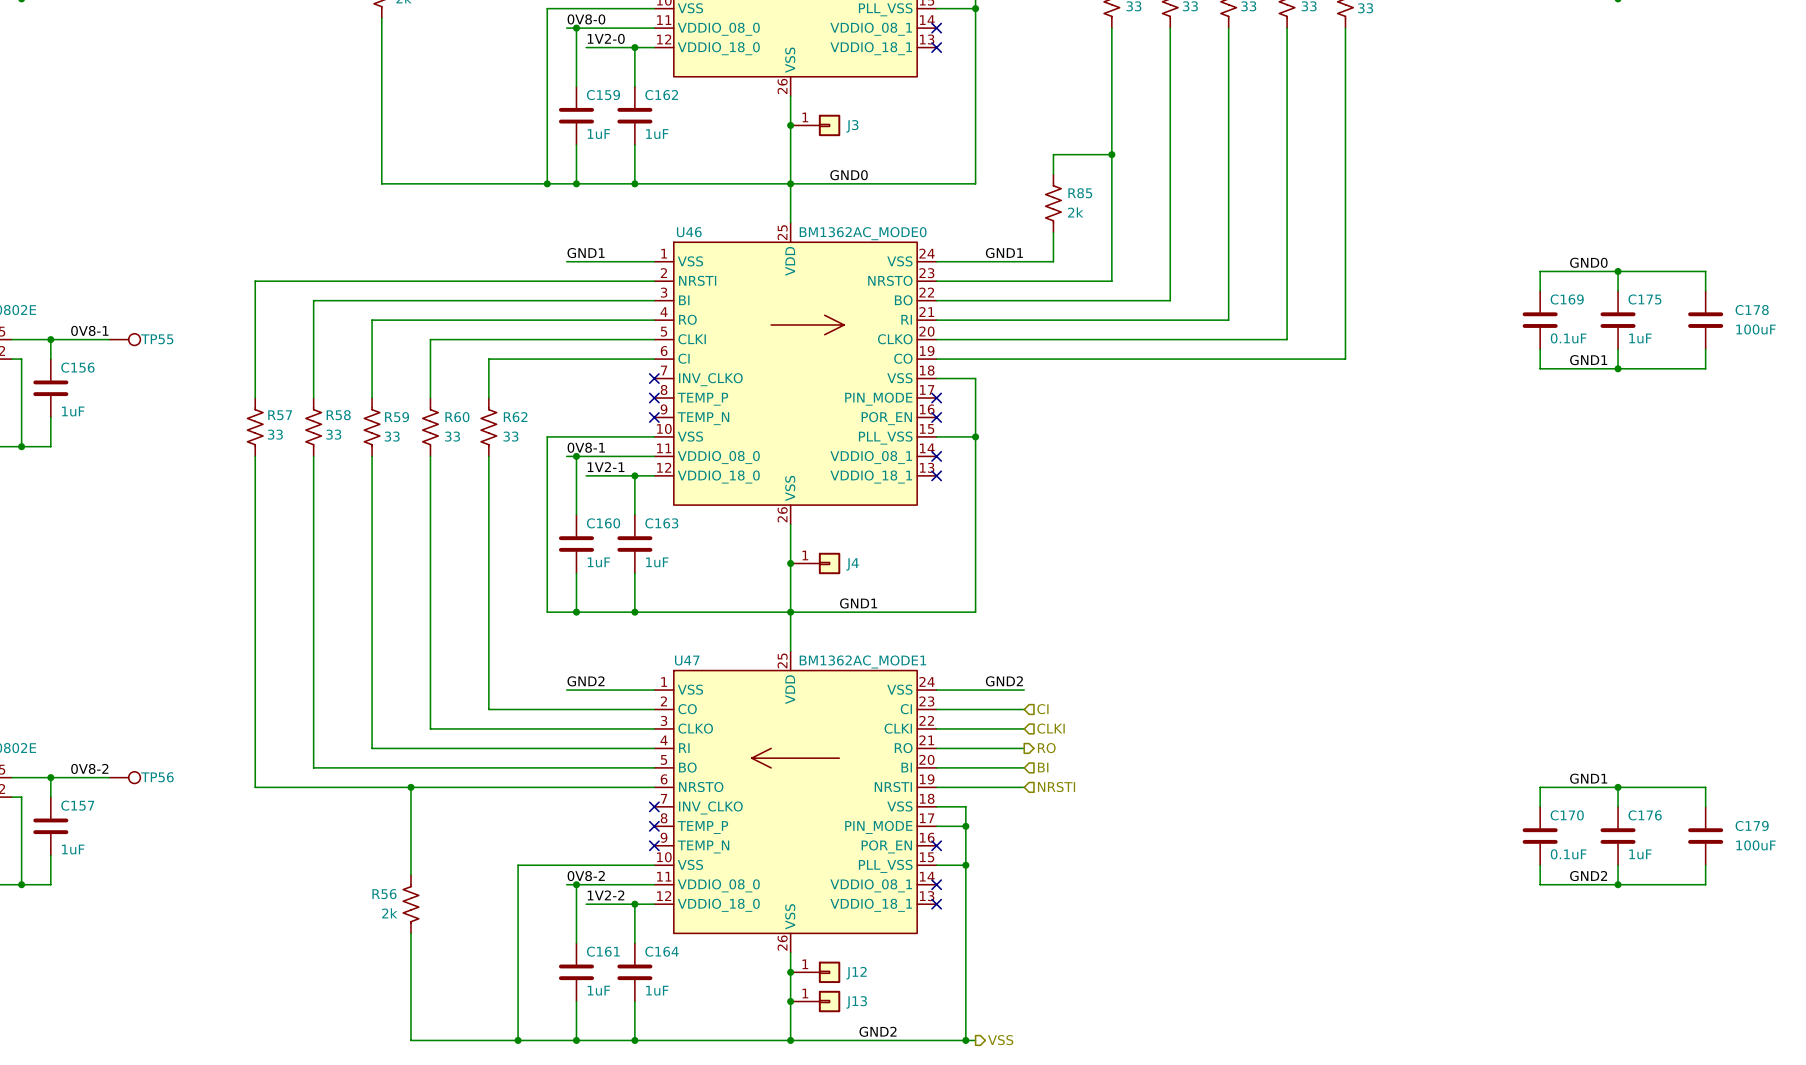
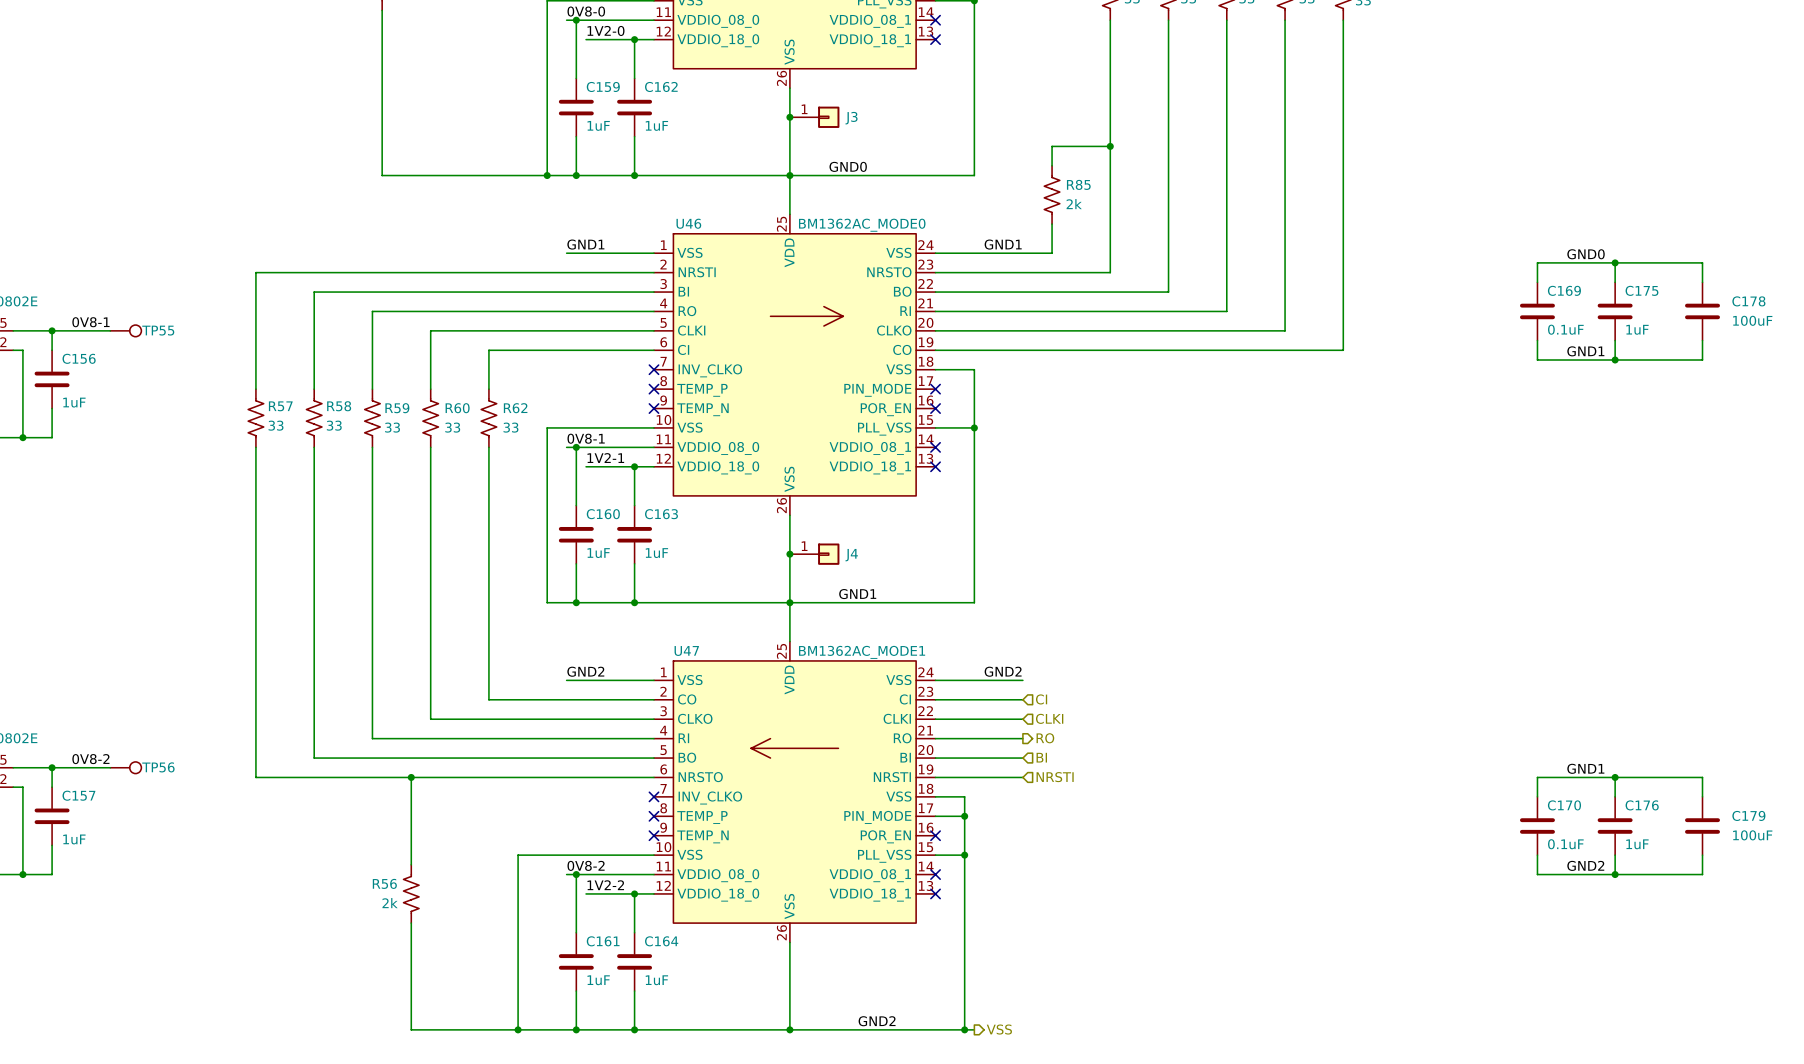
junction: (790, 972) -> none
J12: (815, 972) -> none
junction: (790, 1001) -> none
J13: (815, 1001) -> none

